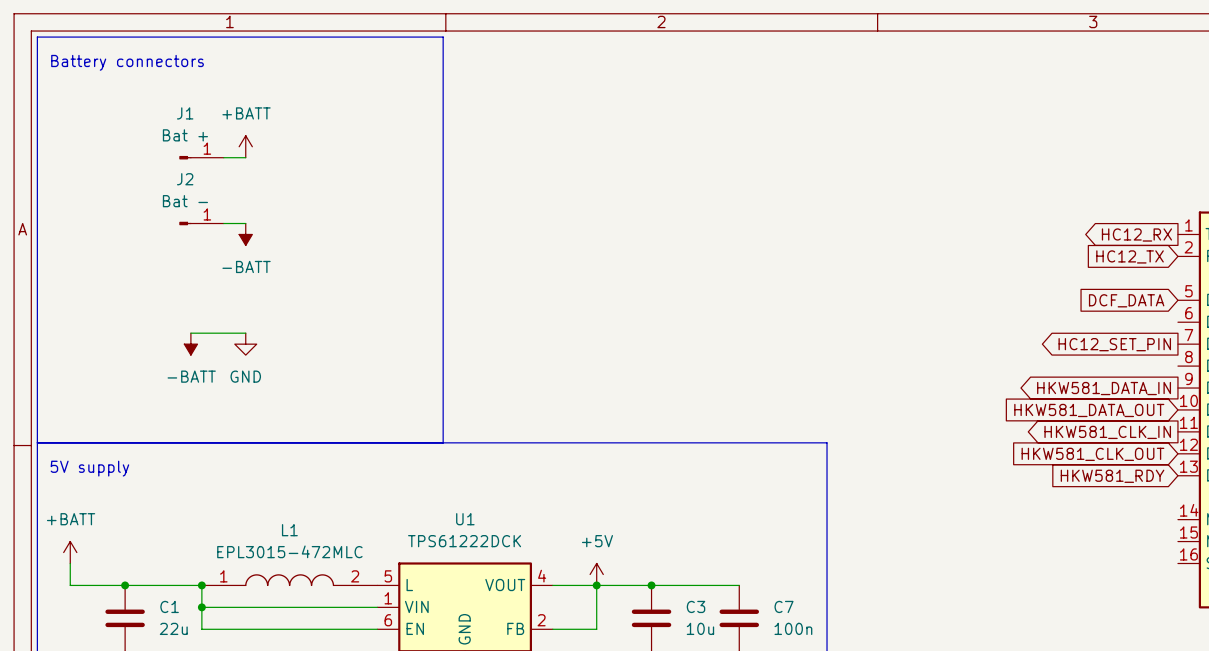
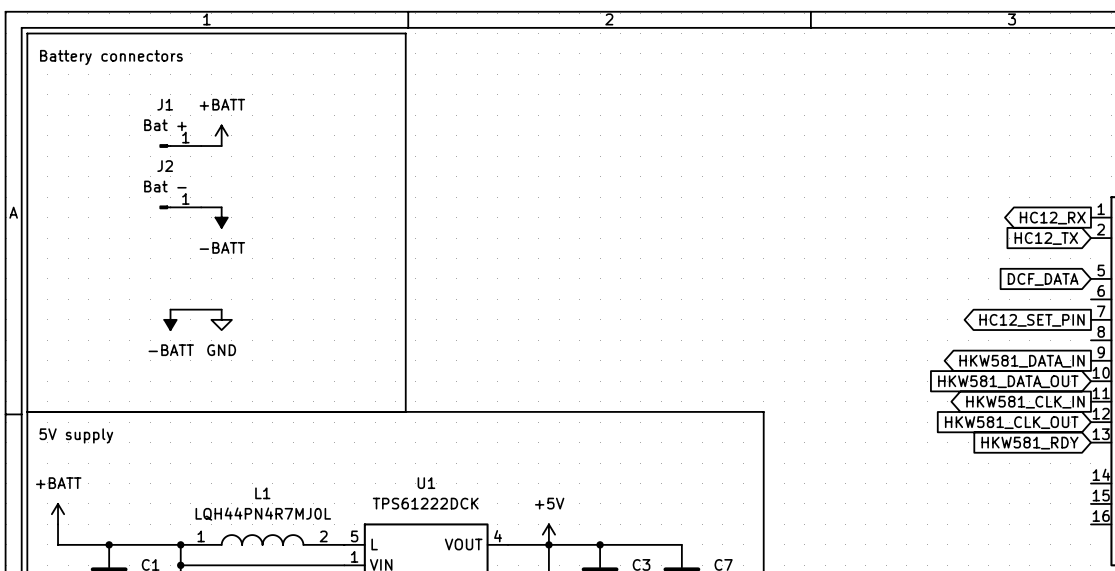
L1 value: EPL3015-472MLC (289, 551) -> LQH44PN4R7MJ0L (263, 514)

